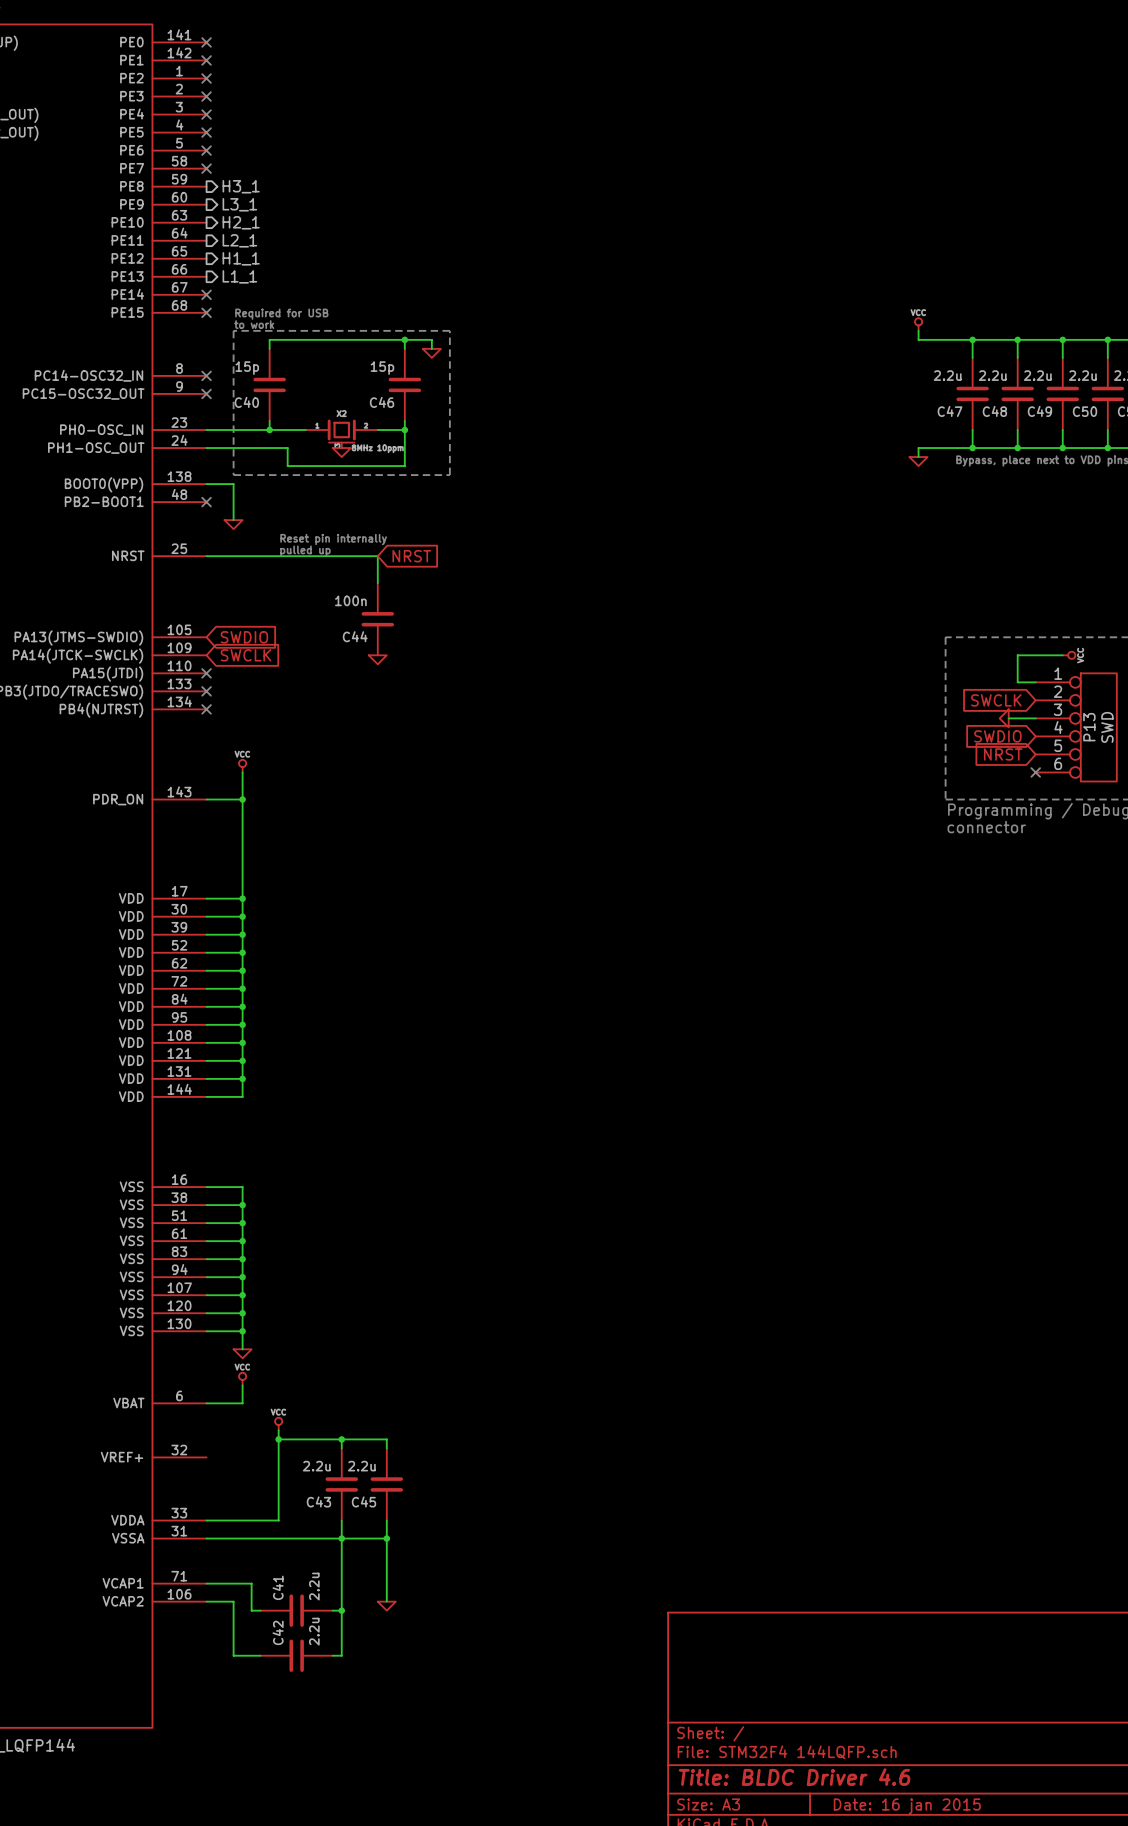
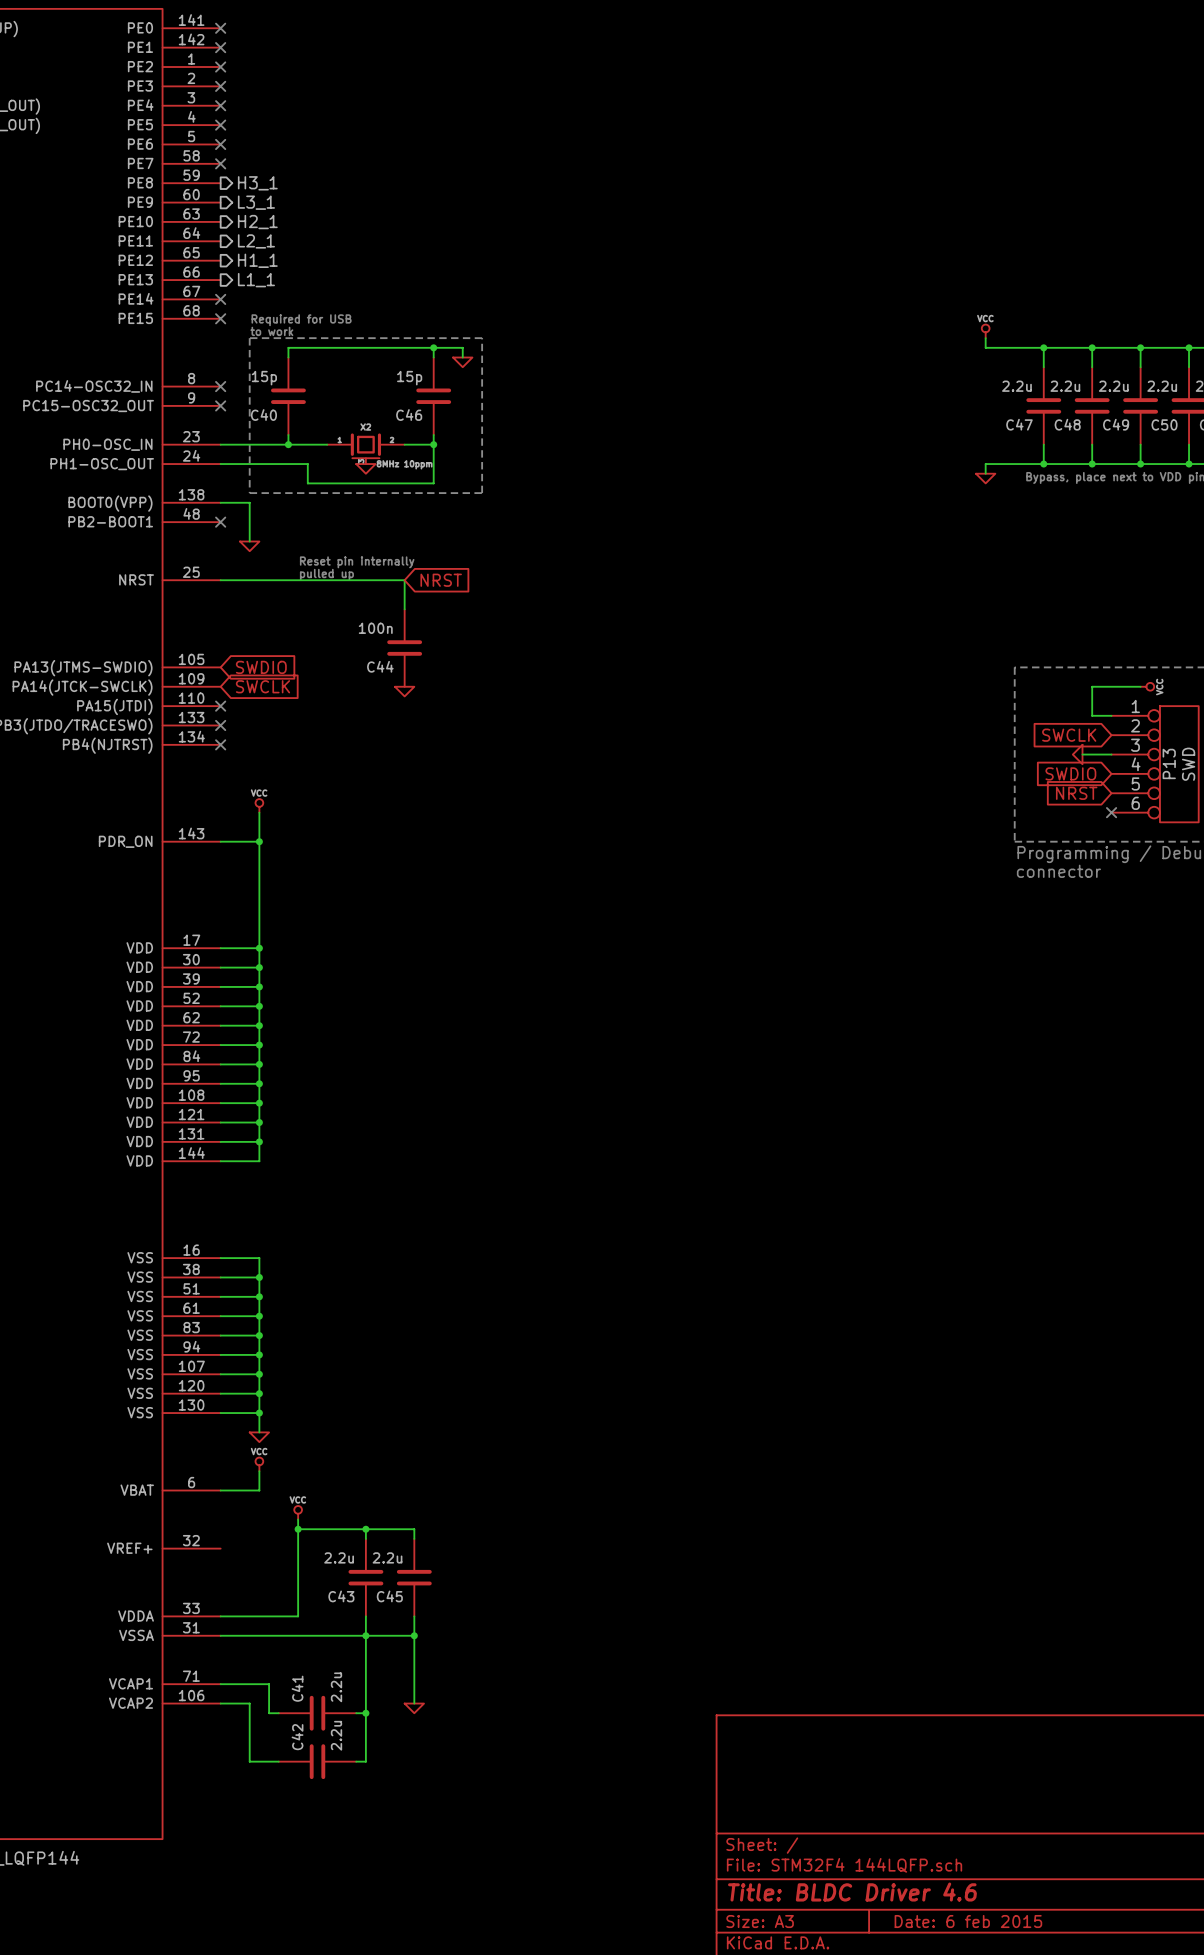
title block: Date: 16 jan 2015 (907, 1806) -> Date: 6 feb 2015 (968, 1921)

